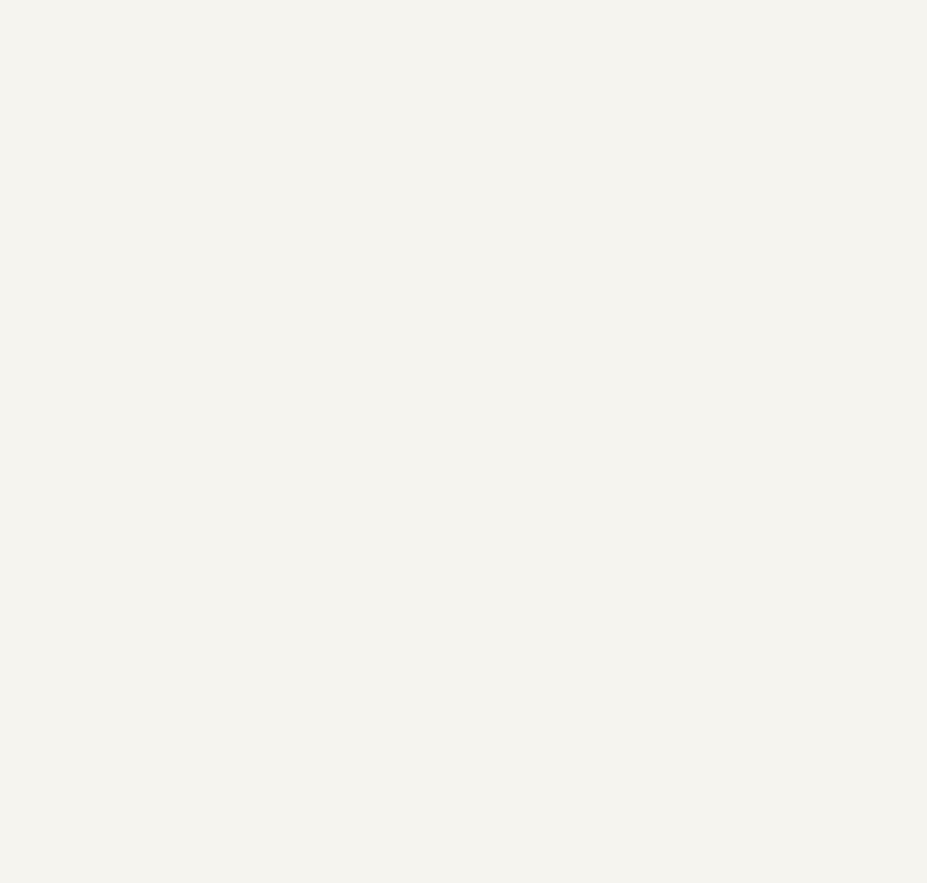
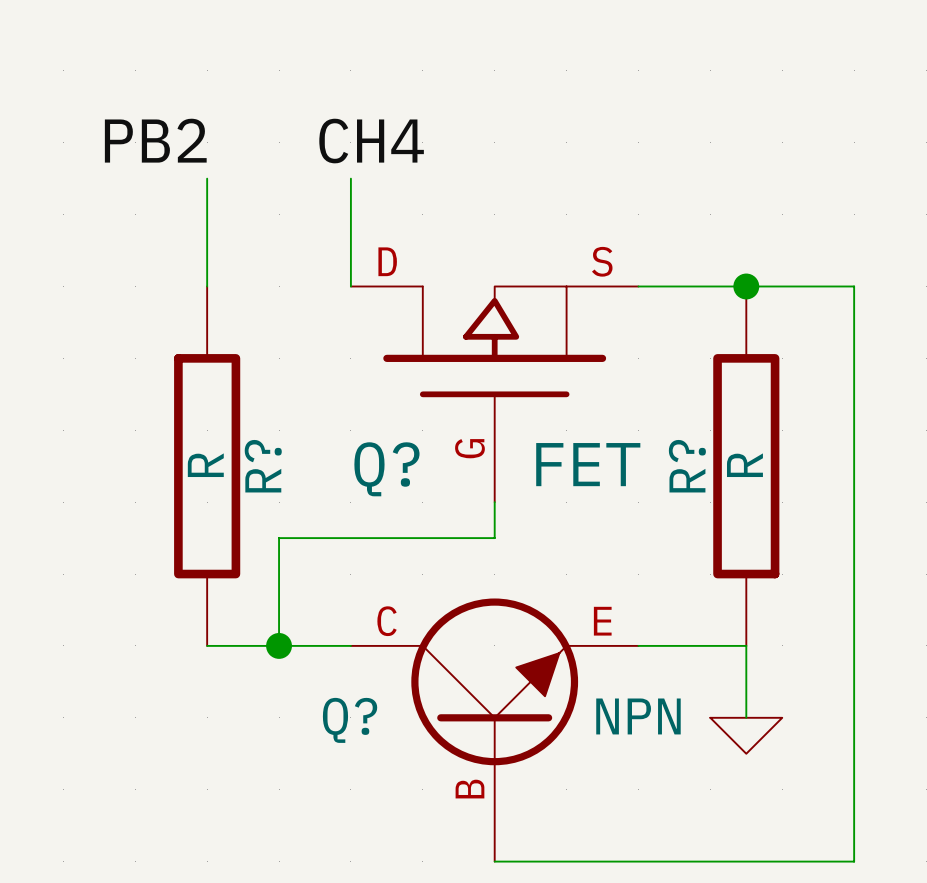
label: none -> CH4 (371, 141)
label: none -> PB2 (155, 140)
wire: none -> (207, 178) (207, 286)
wire: none -> (350, 178) (350, 286)
wire: none -> (638, 286) (854, 286) (854, 861) (494, 861)
junction: none -> (746, 286)
Q?: none -> FET (494, 394)
R?: none -> R (207, 466)
R?: none -> R (746, 466)
wire: none -> (494, 502) (494, 538) (279, 538) (279, 645)
wire: none -> (207, 645) (350, 645)
junction: none -> (279, 645)
wire: none -> (638, 645) (746, 645) (746, 717)
Q?: none -> NPN (494, 730)
power symbol: none -> (746, 735)

